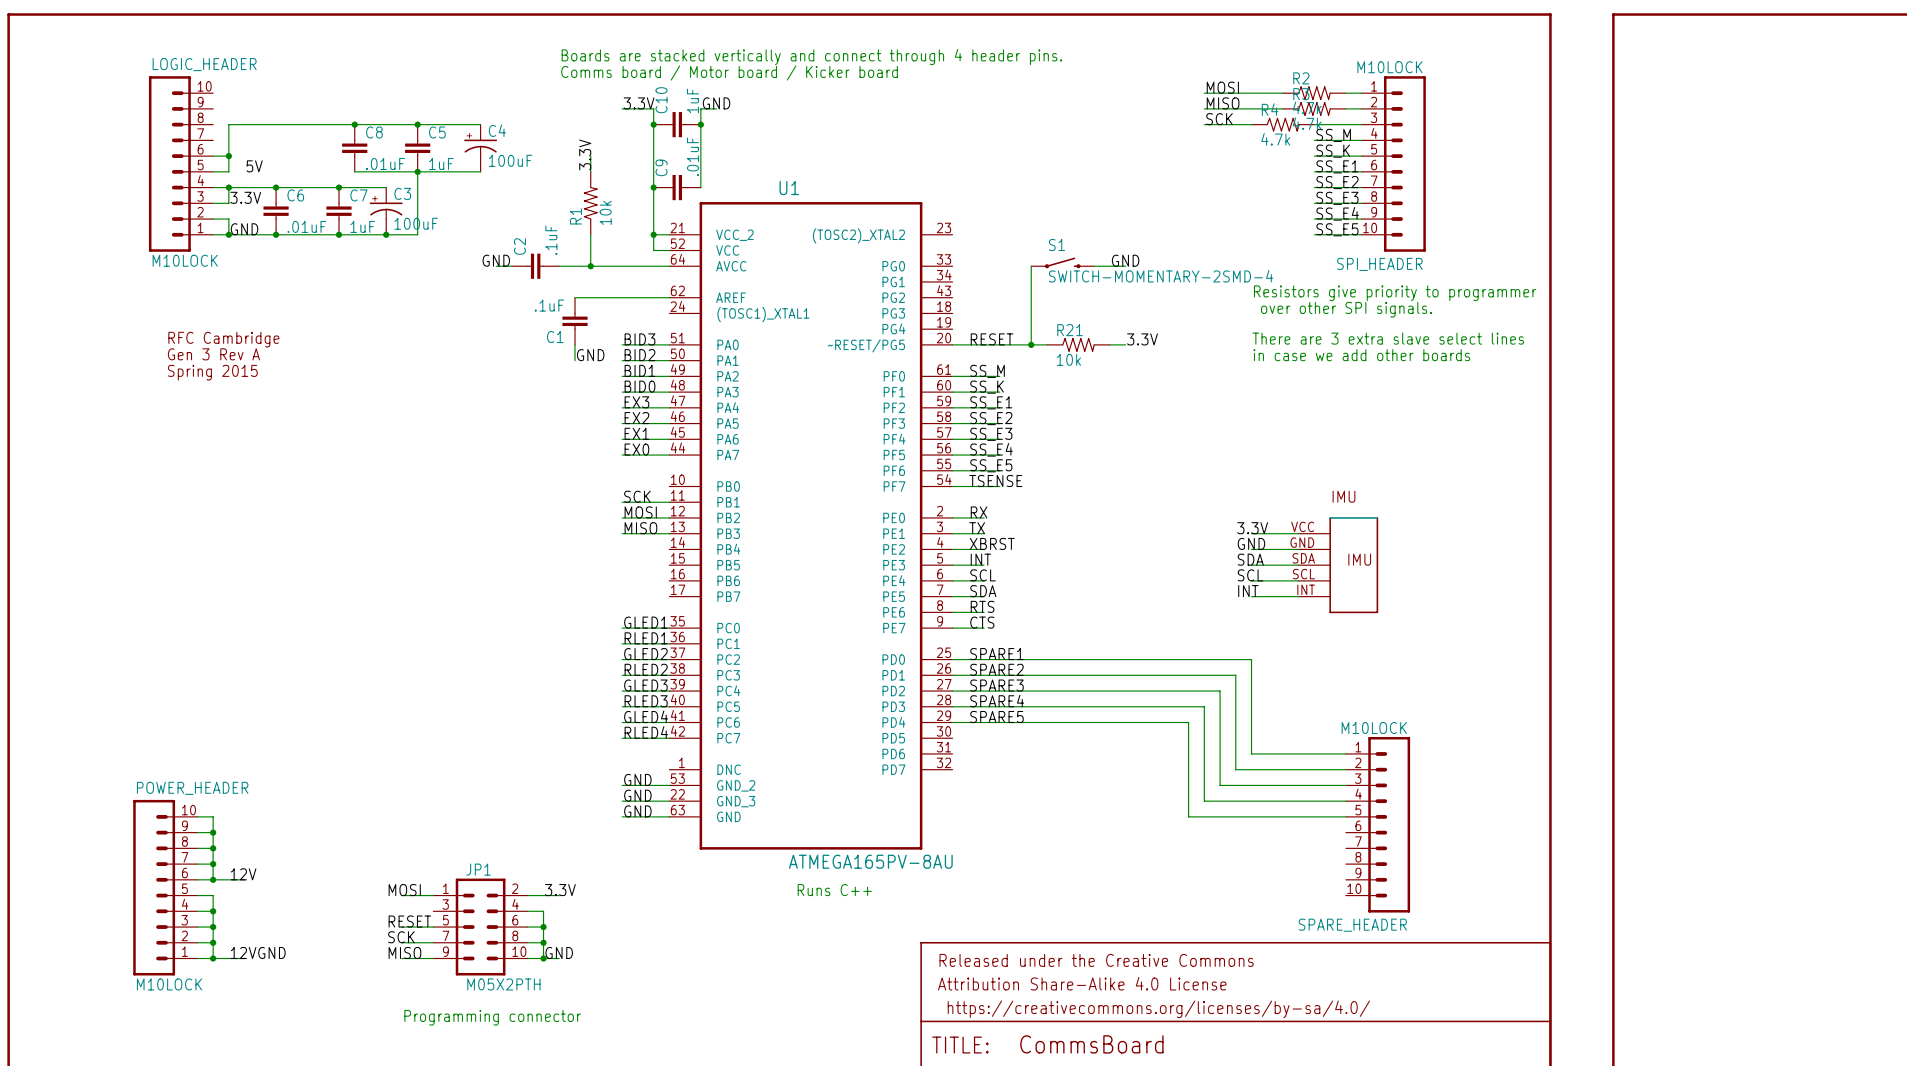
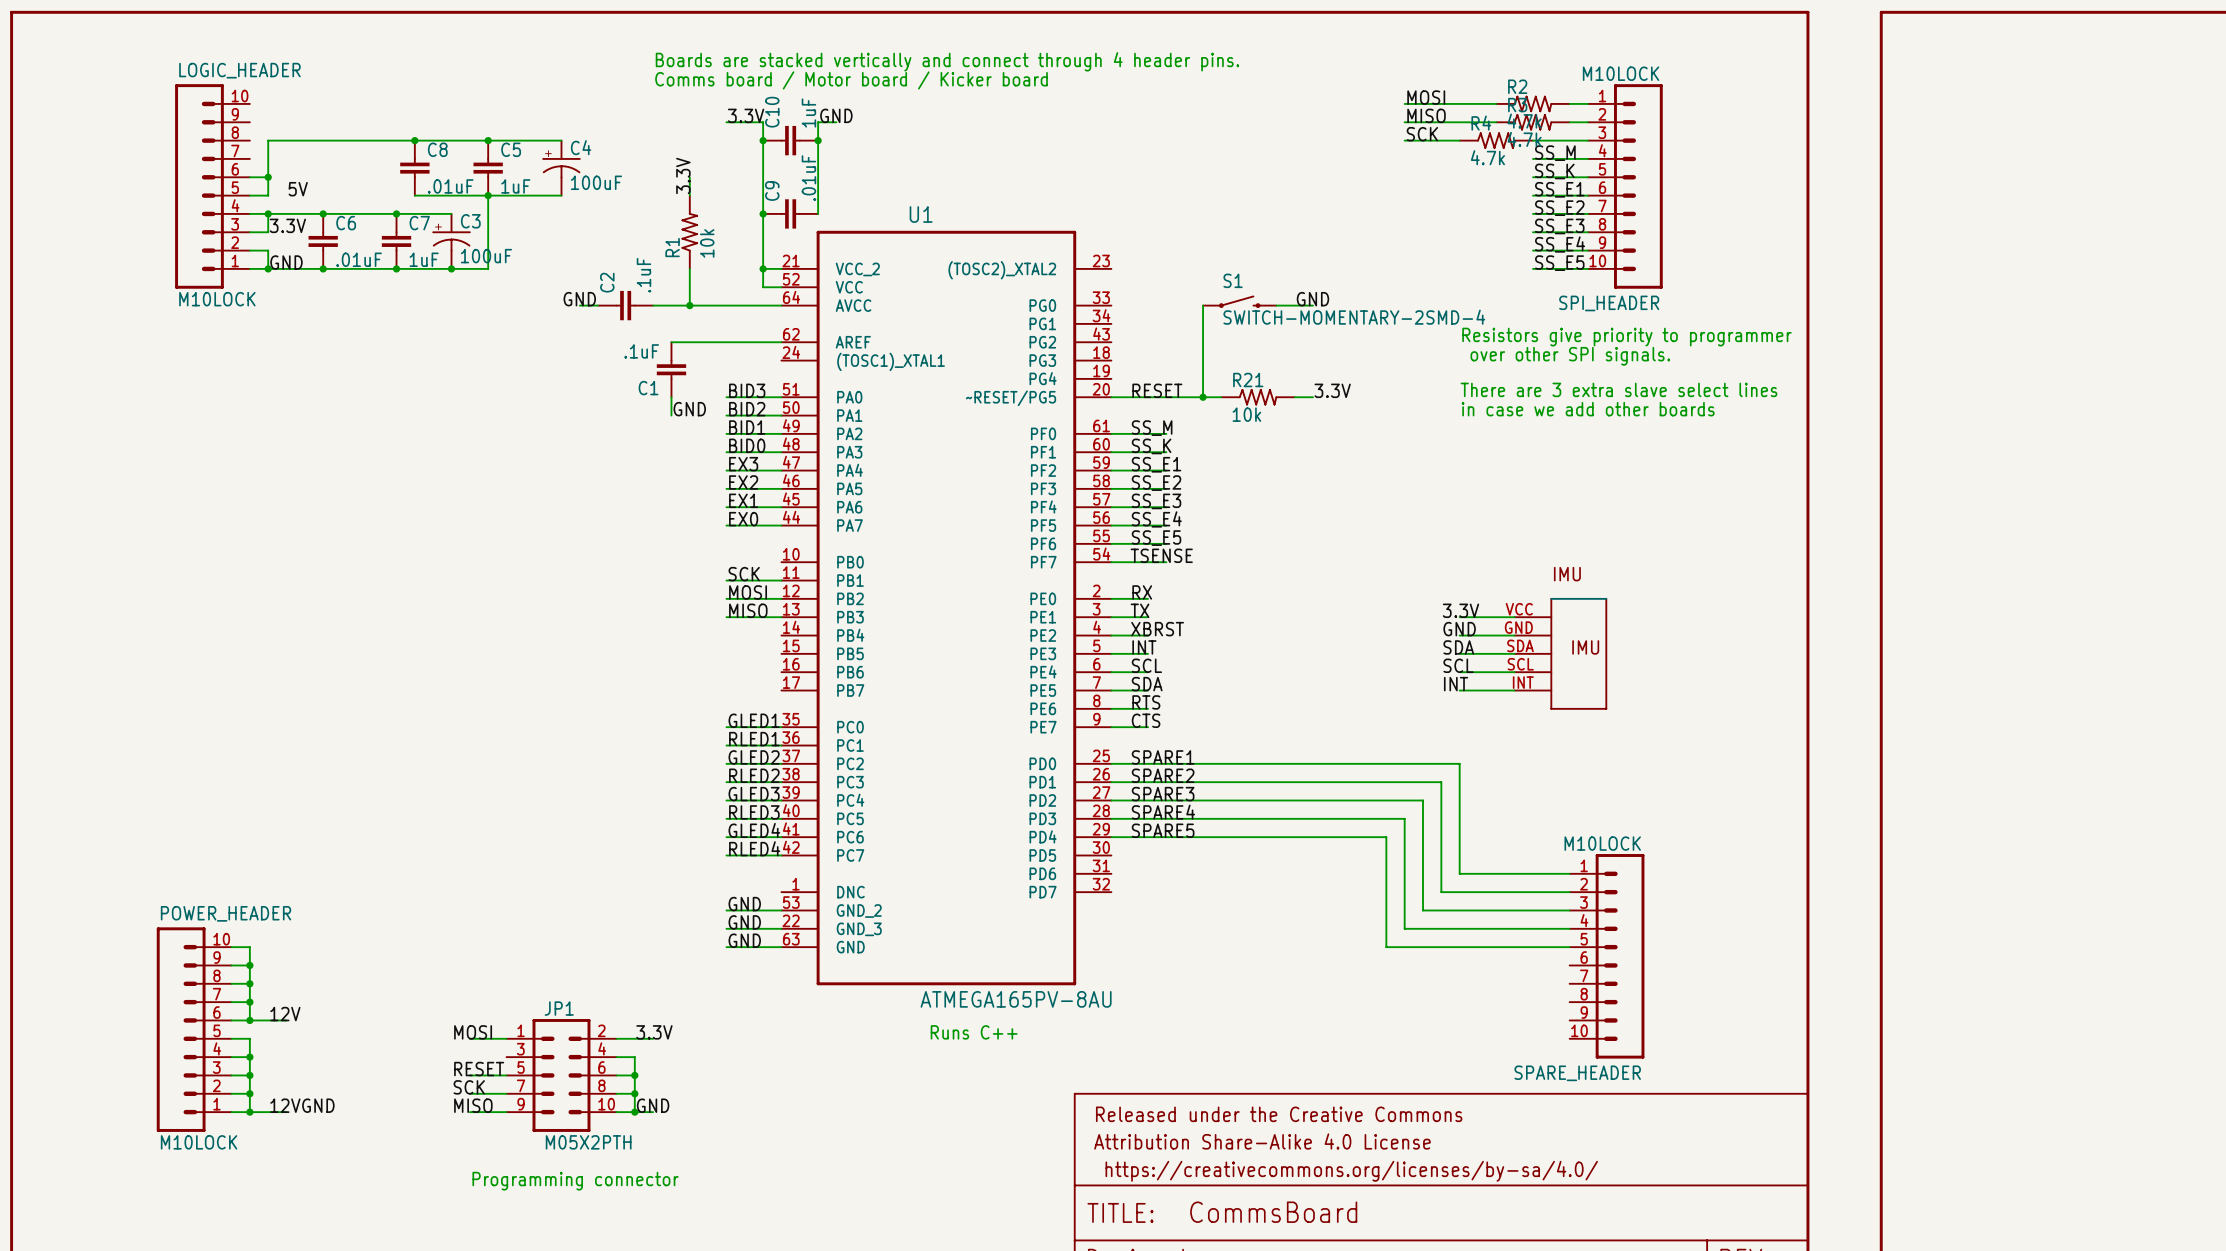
part: (223, 356) -> none

